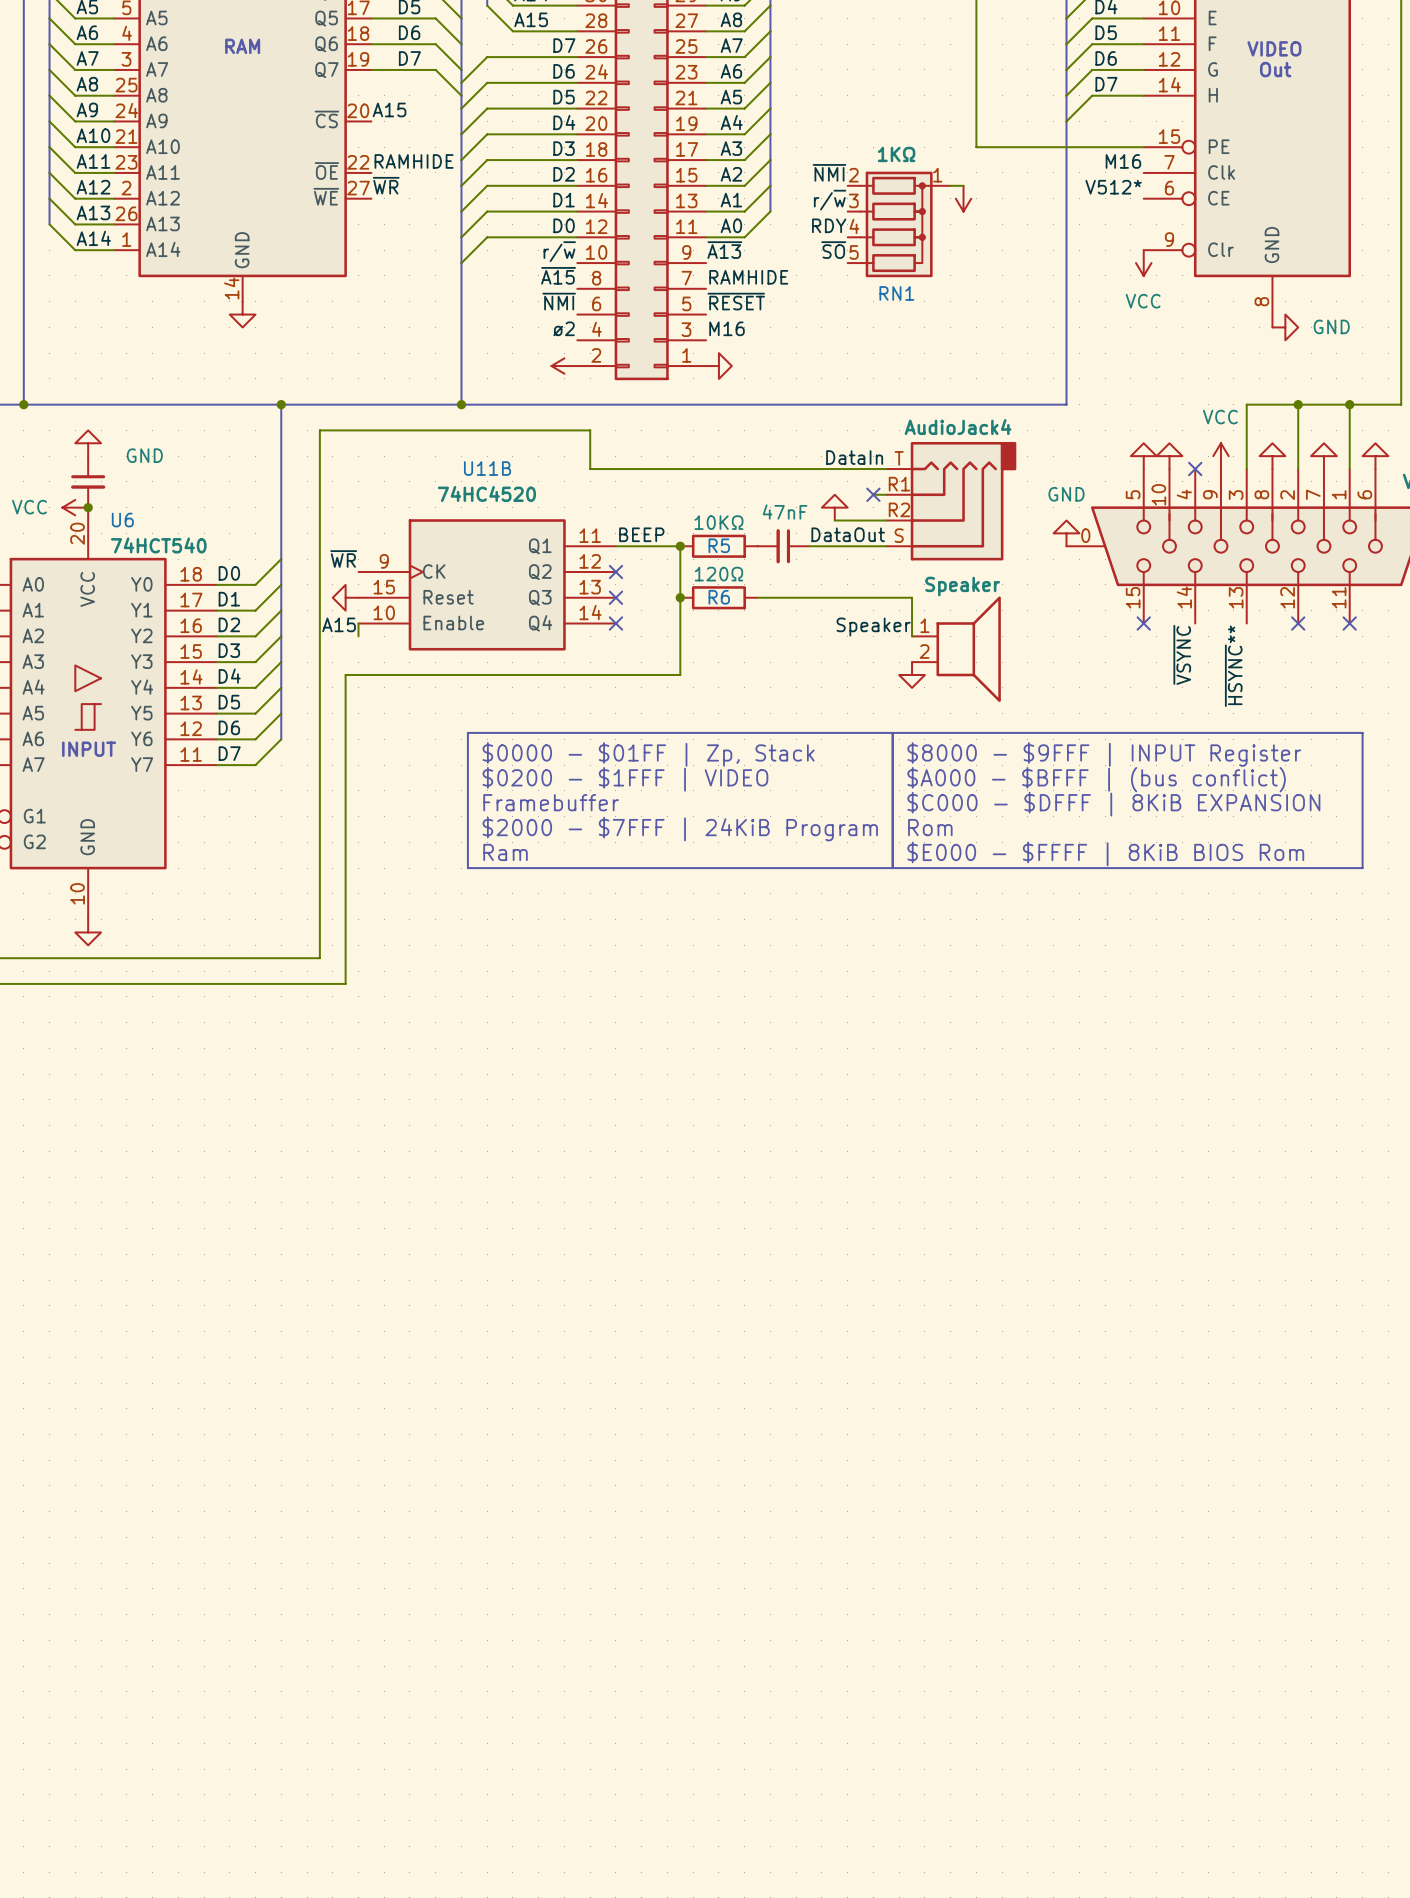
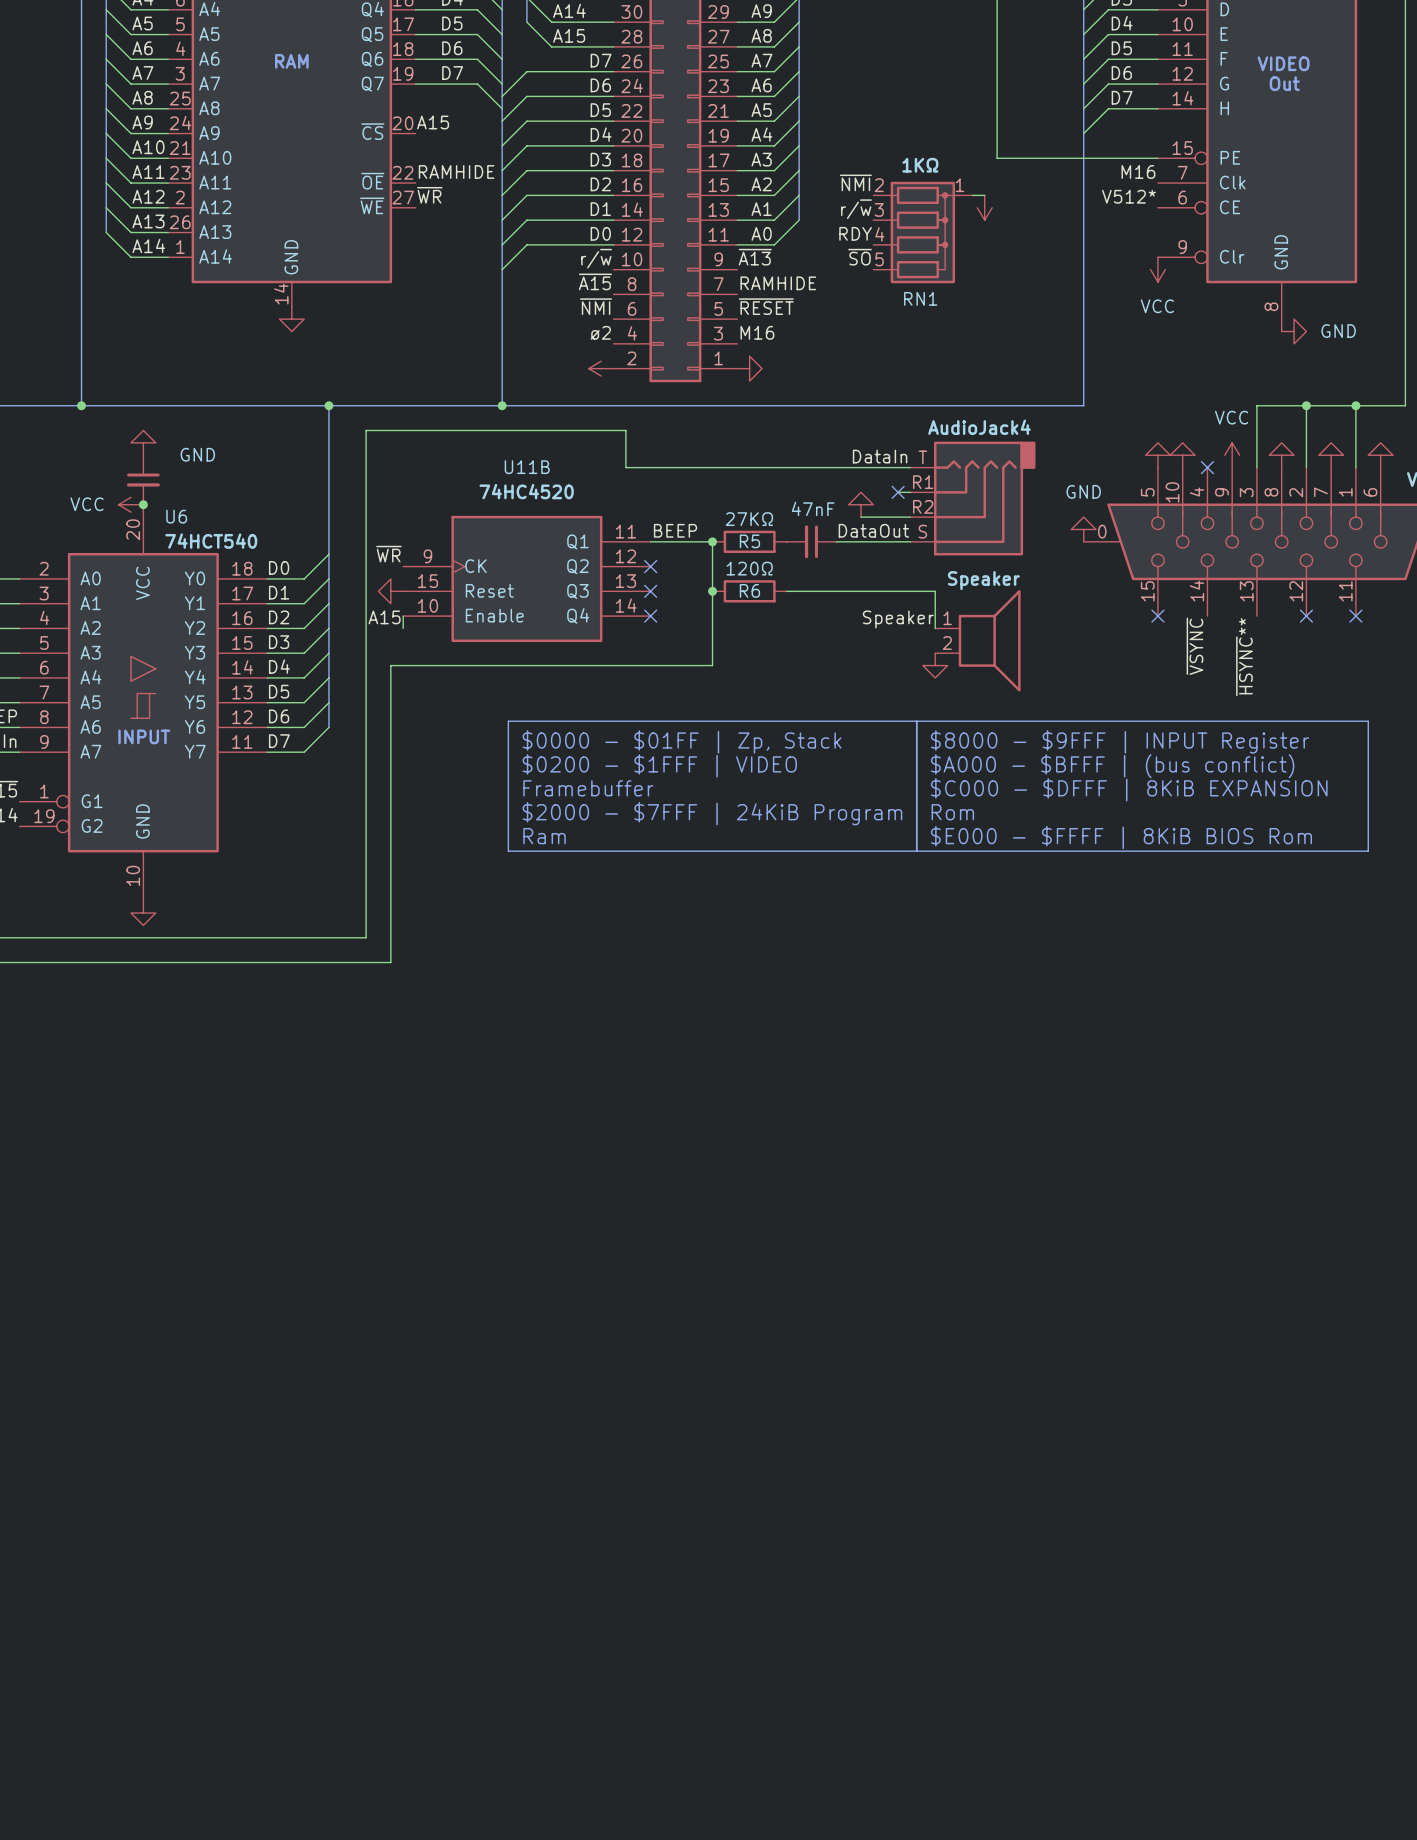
R5 value: 10KΩ (718, 522) -> 27KΩ (749, 519)

